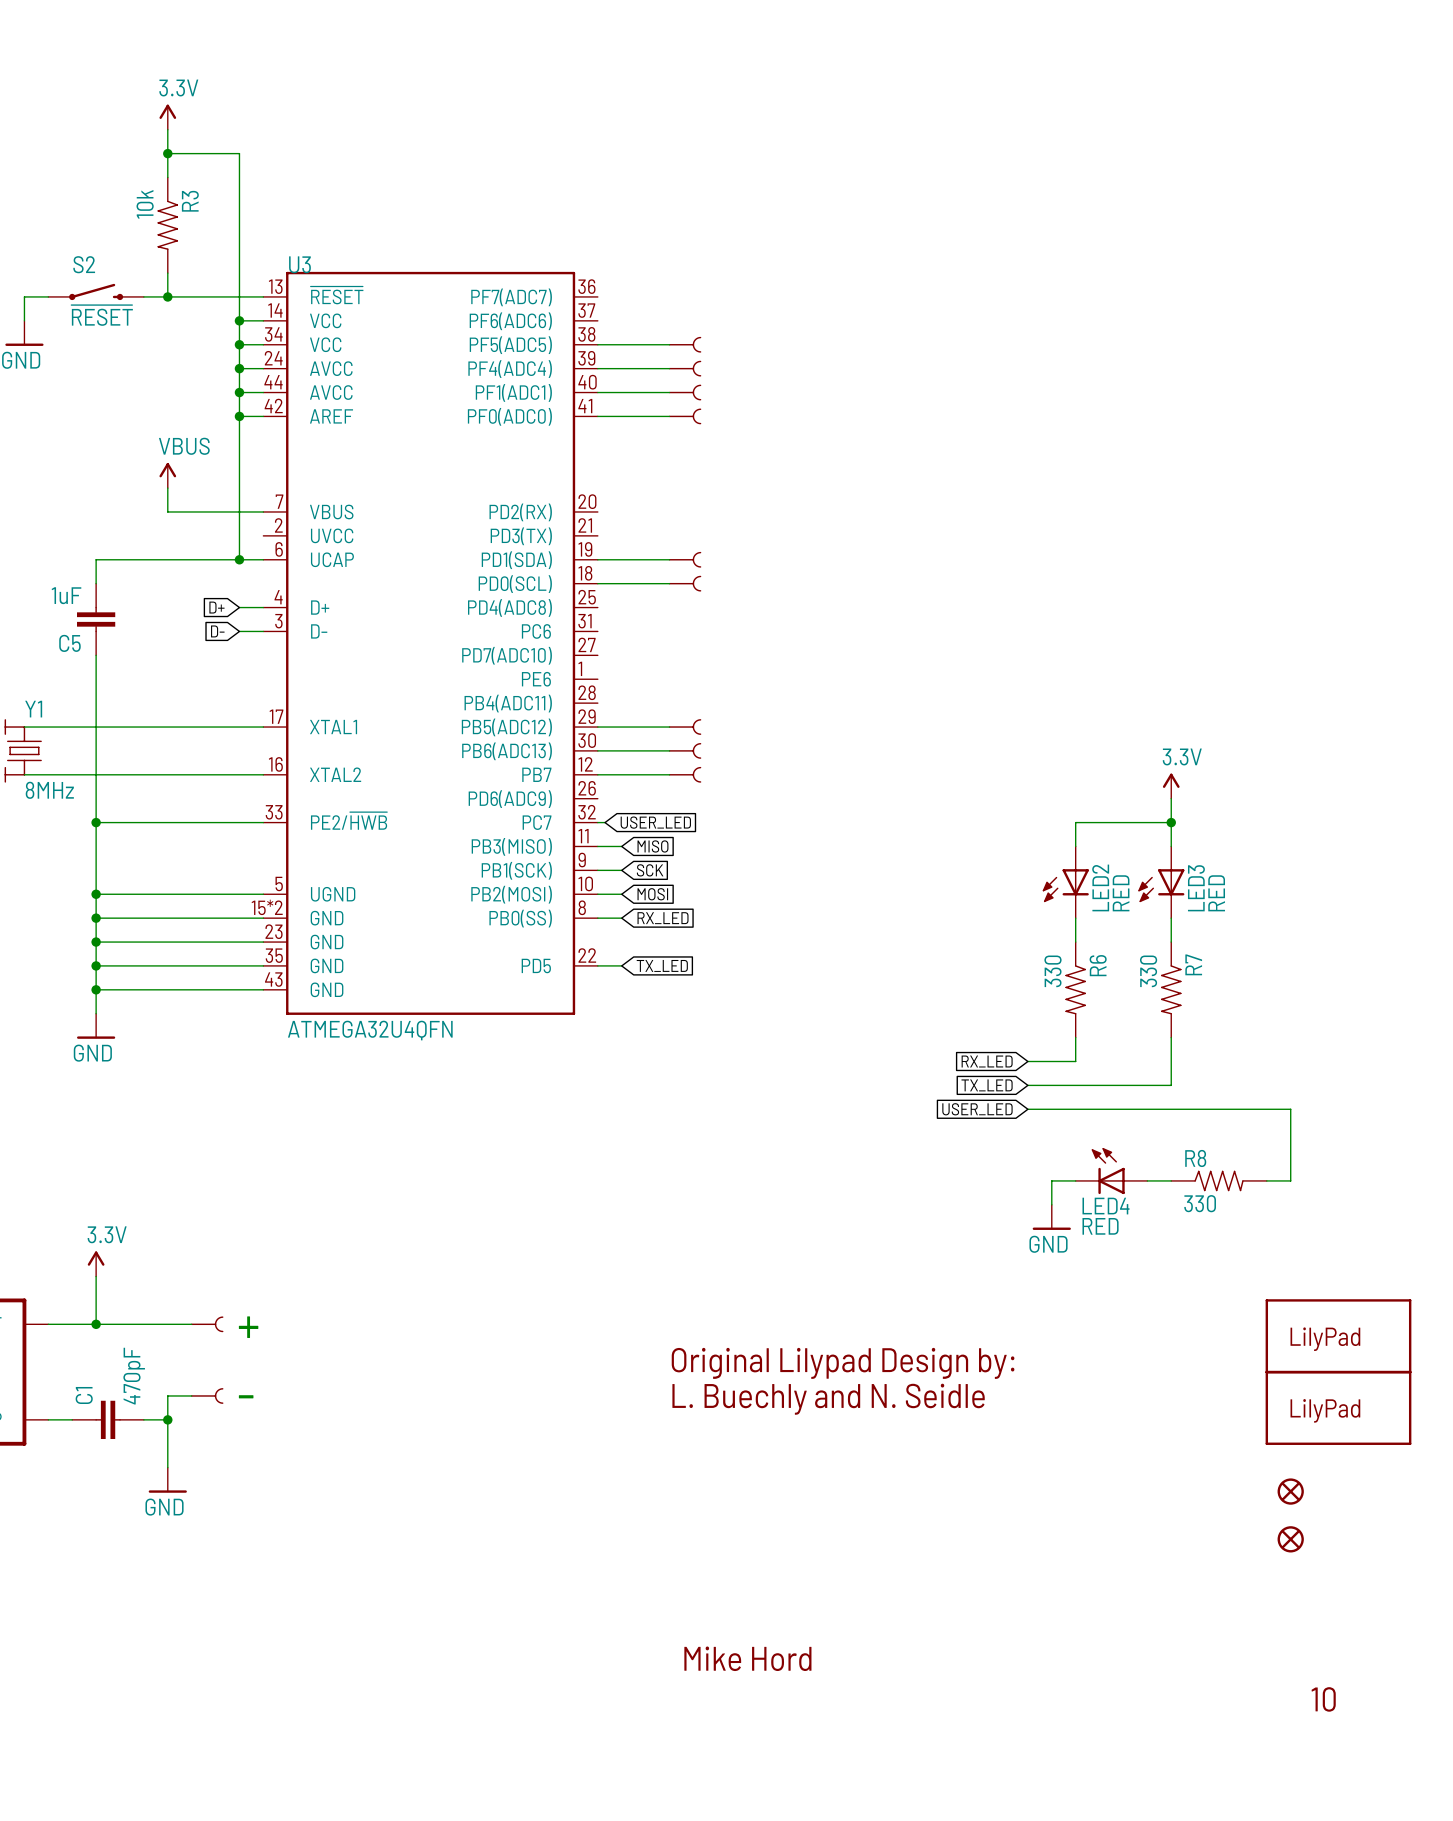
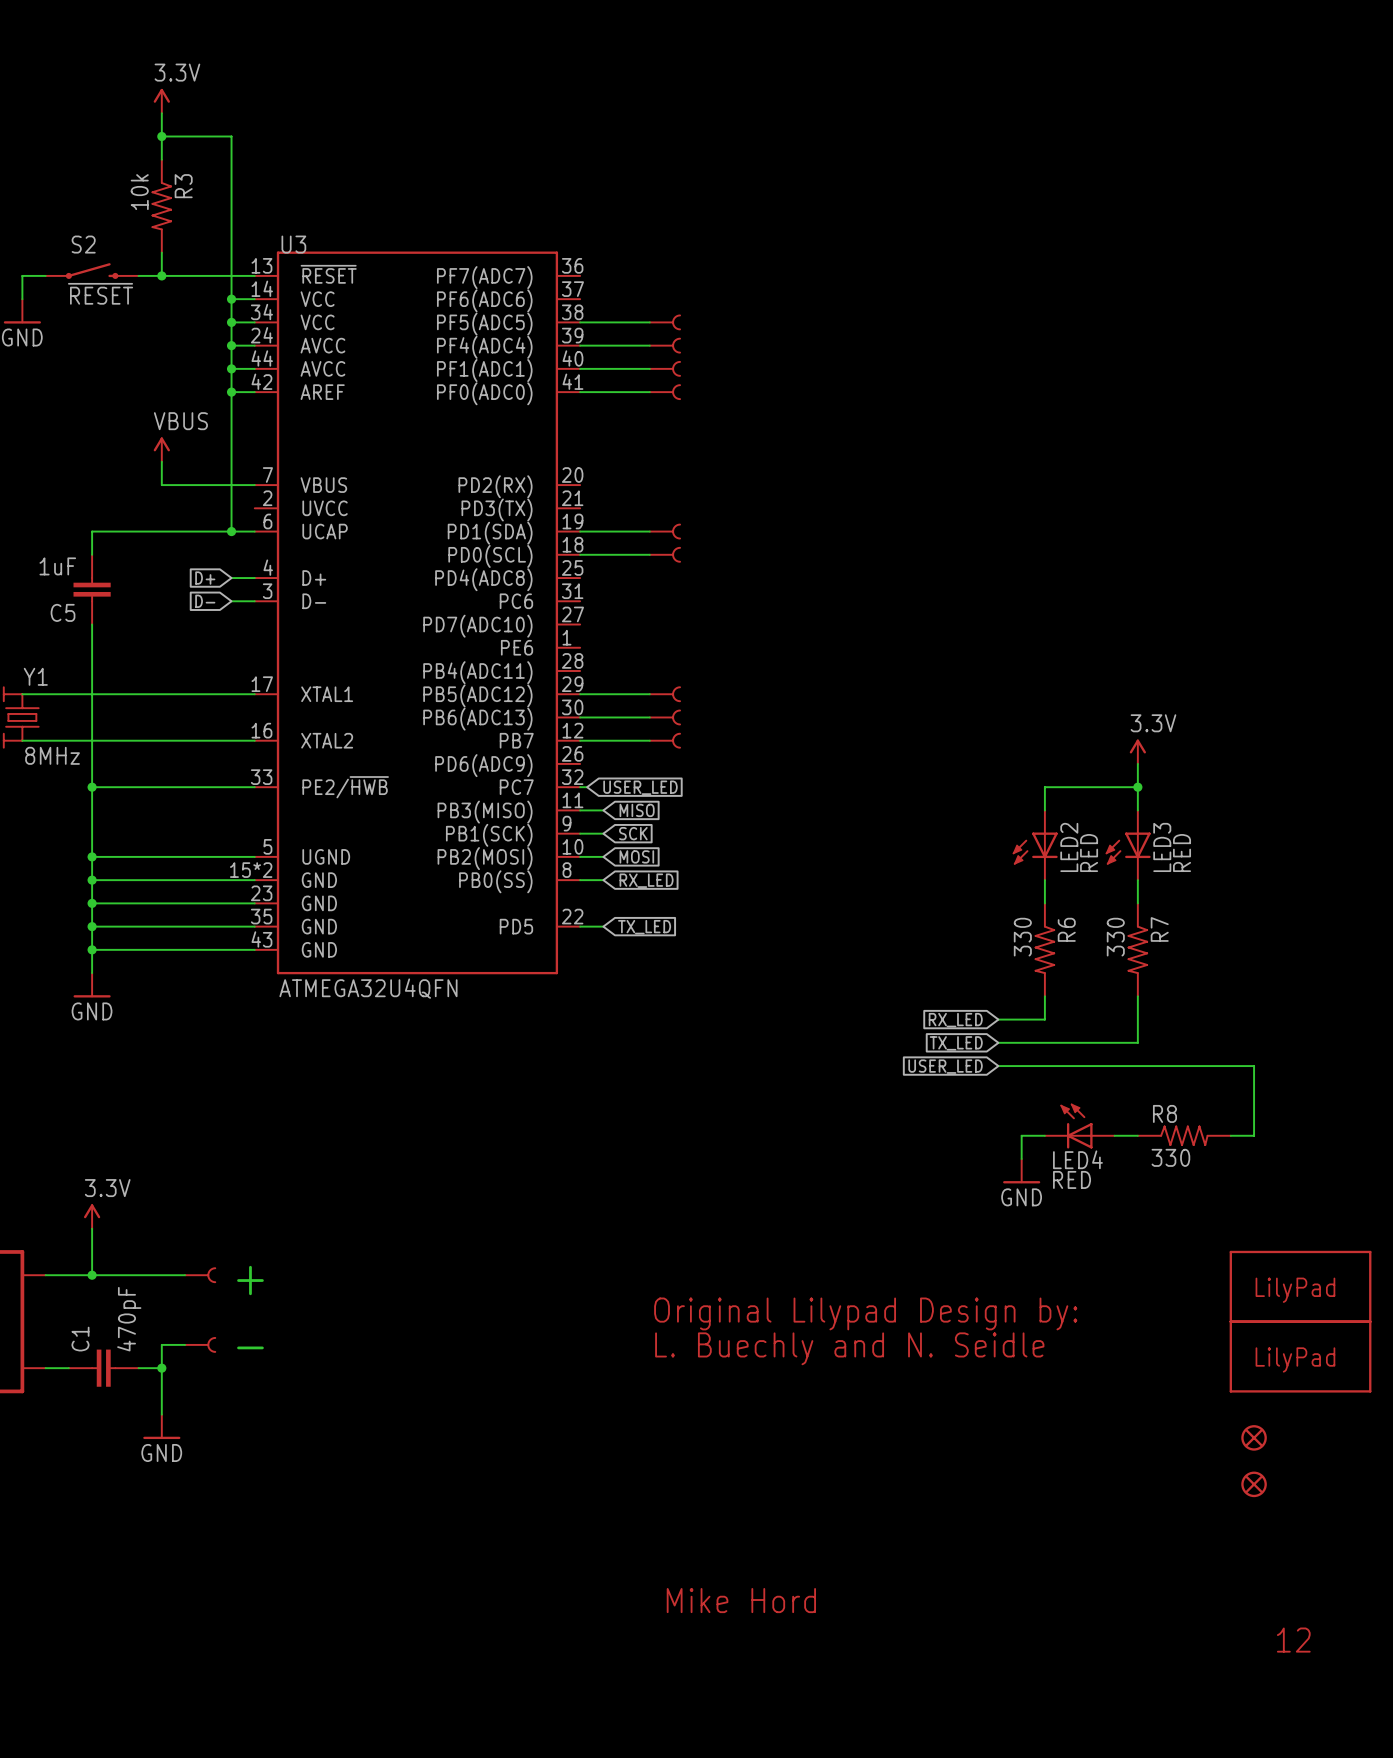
text: 10 (1323, 1699) -> 12 (1293, 1640)

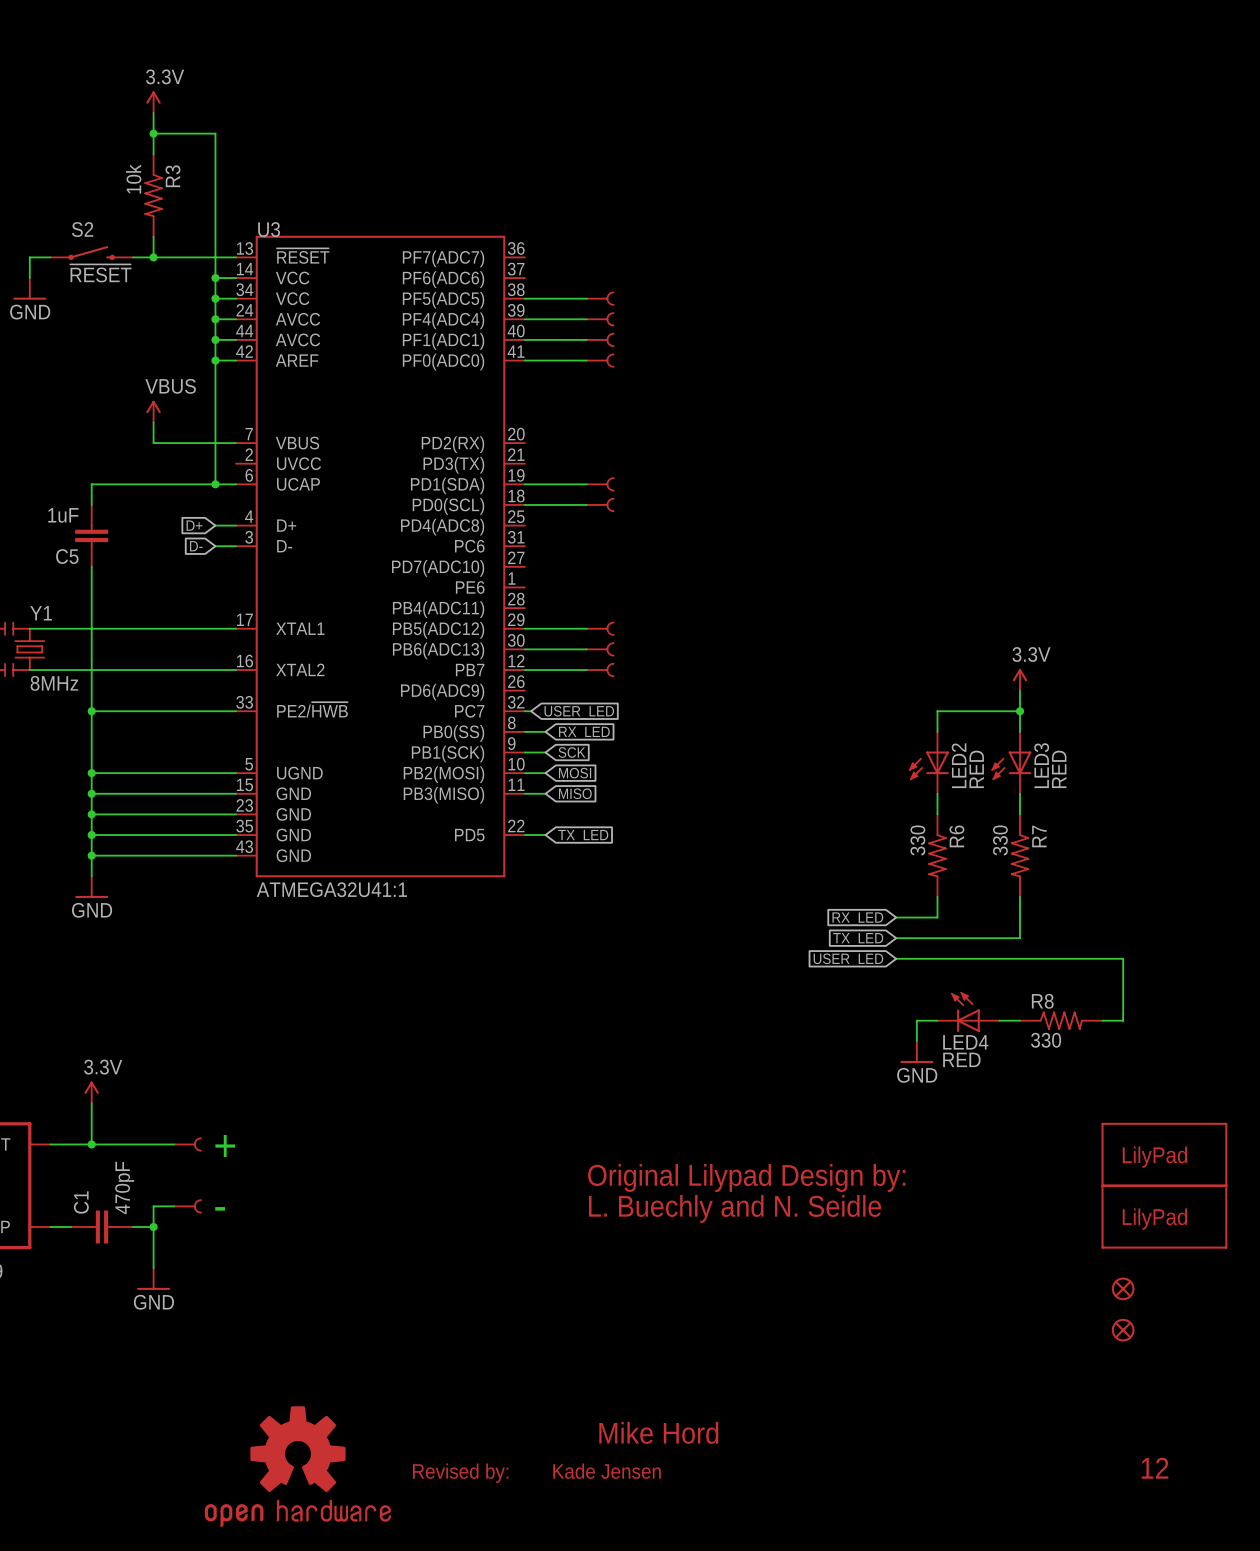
U3 pin number: 11 (572, 800) -> 8 (511, 722)
global label: MISO (637, 810) -> RX_LED (584, 733)
U3 pin name: PB3(MISO) (485, 812) -> PB0(SS) (453, 733)
U3 pin number: 15*2 (251, 870) -> 15 (244, 784)
U3 pin number: 8 (566, 870) -> 11 (516, 784)
global label: RX_LED (646, 880) -> MISO (575, 793)
U3 pin name: PB0(SS) (495, 881) -> PB3(MISO) (443, 795)
U3 value: ATMEGA32U4QFN (368, 988) -> ATMEGA32U41:1 (331, 889)
part: none -> (297, 1466)
text: none -> Kade Jensen (607, 1471)
text: none -> Revised by: (460, 1473)

